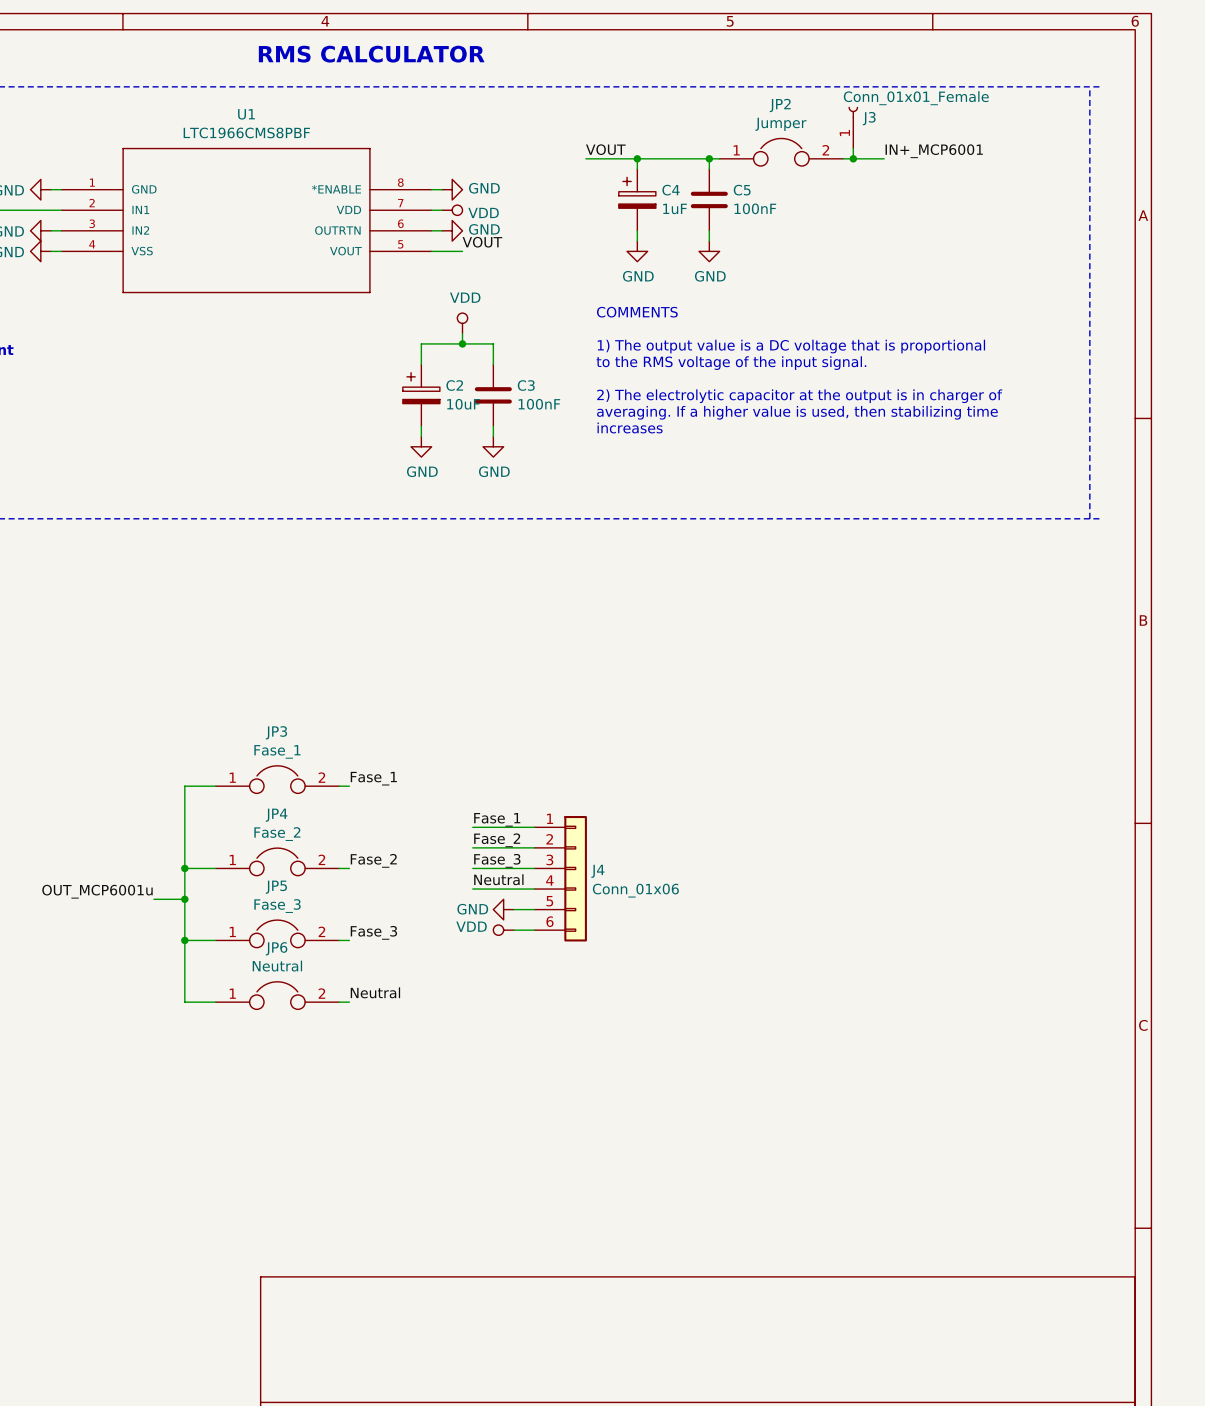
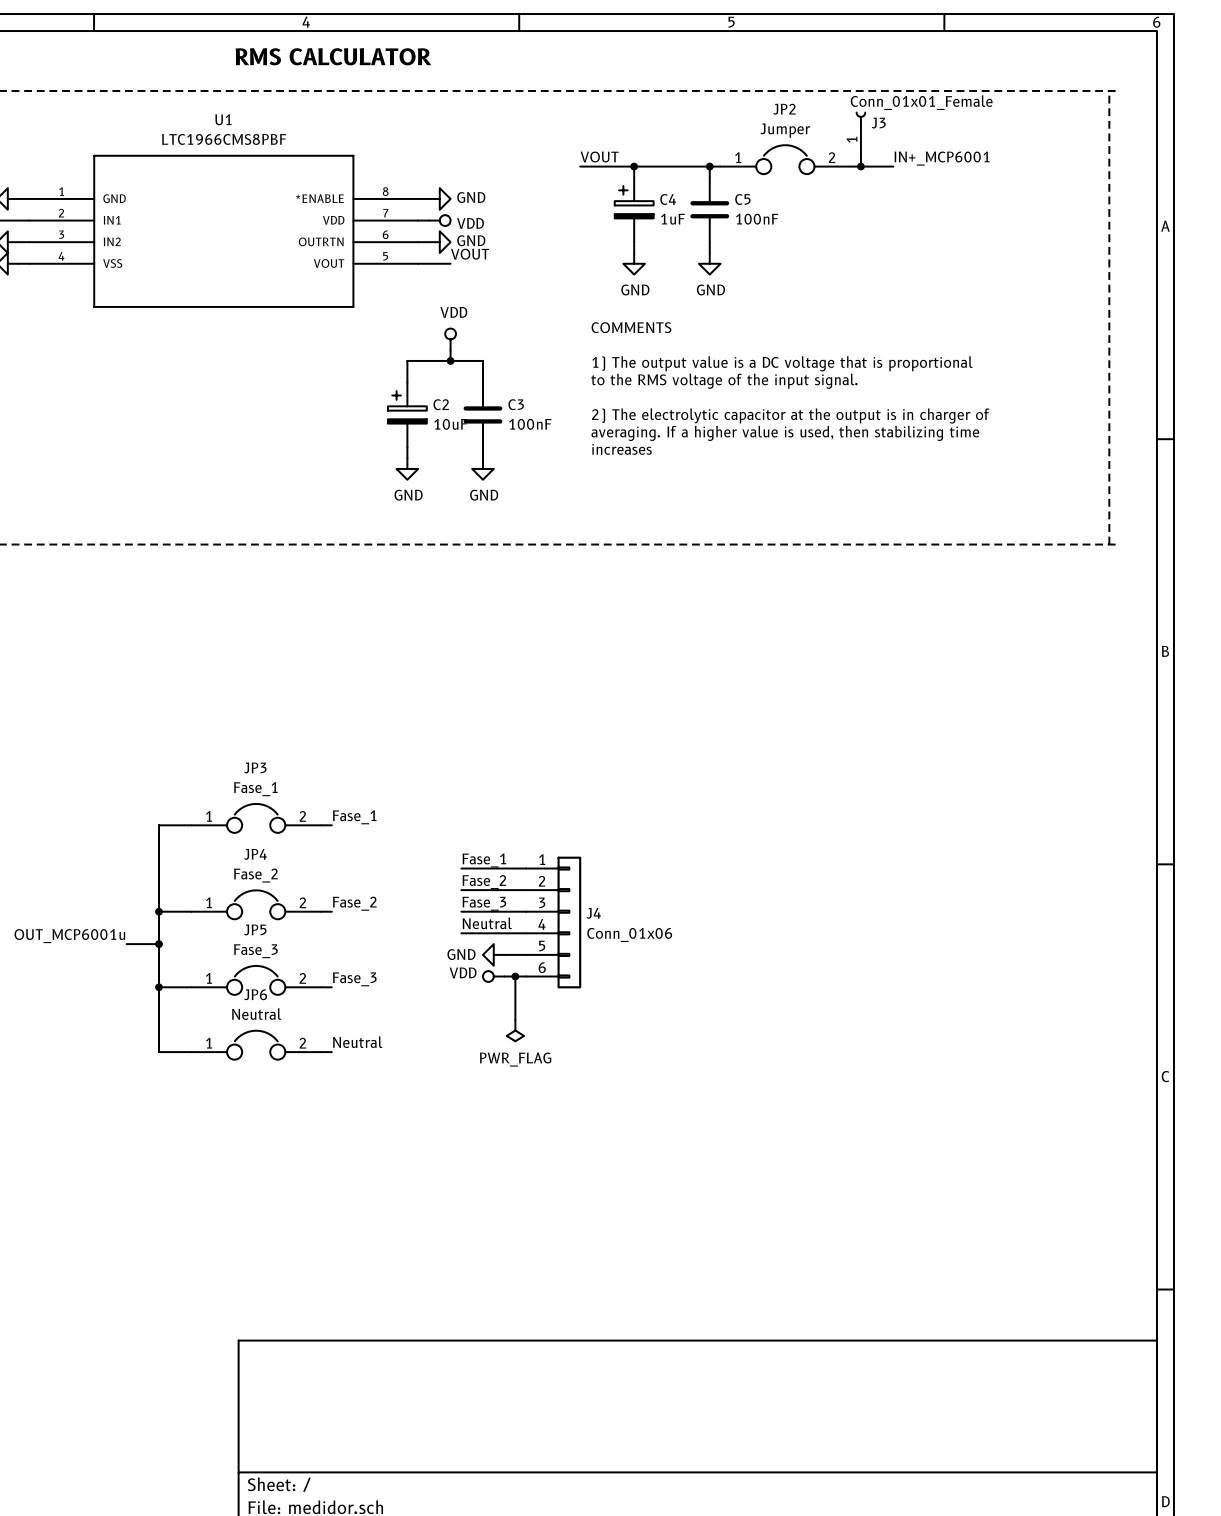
wire: none -> (515, 976) (515, 1019)
junction: none -> (515, 976)
power symbol: none -> PWR_FLAG (515, 1030)

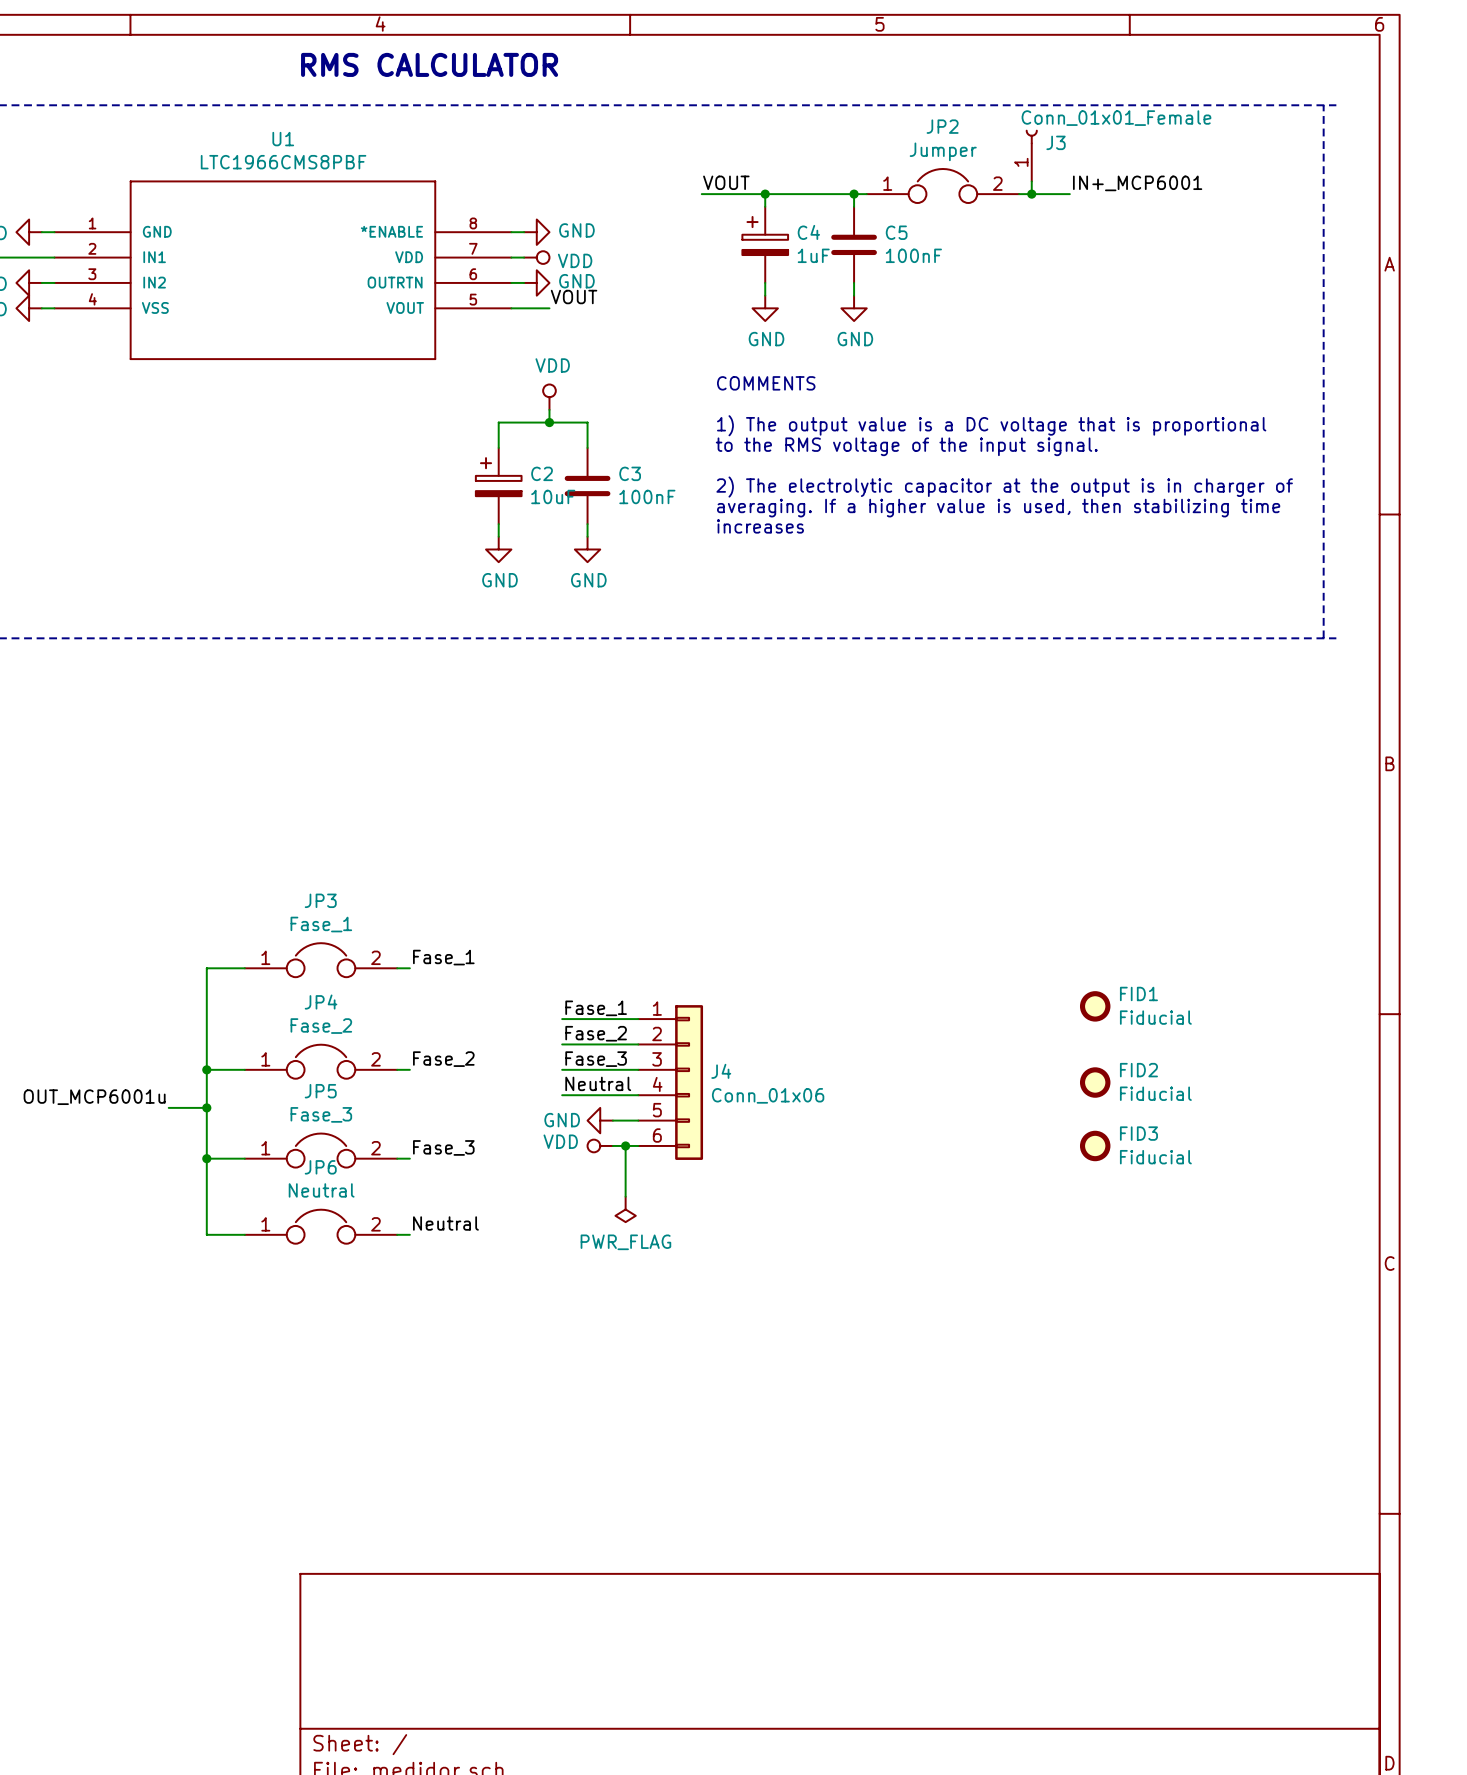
FID1: none -> Fiducial (1095, 1006)
FID2: none -> Fiducial (1095, 1082)
FID3: none -> Fiducial (1095, 1145)

